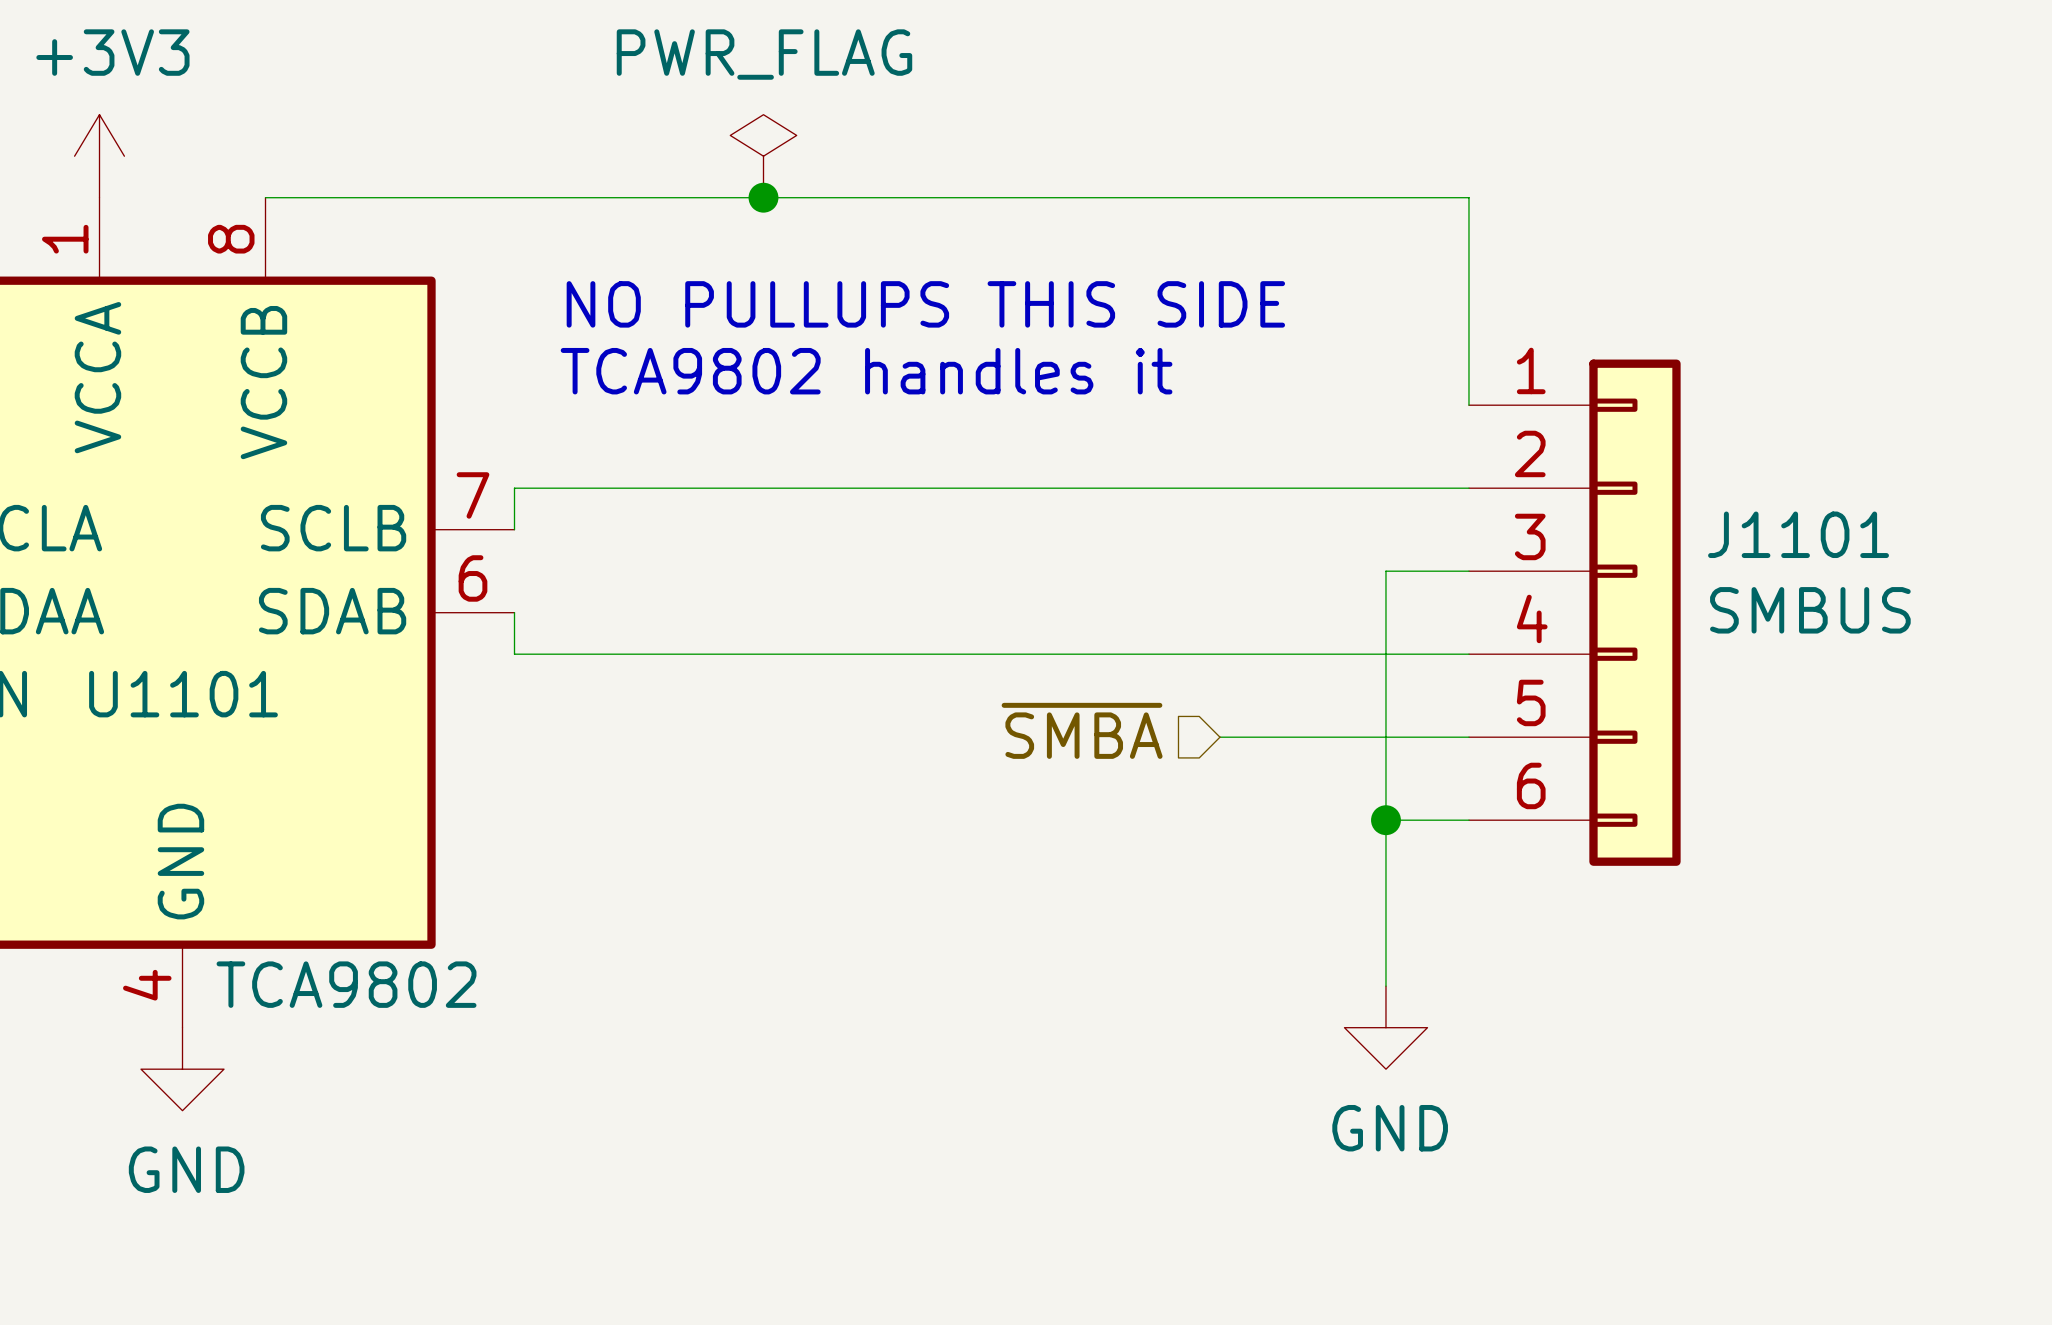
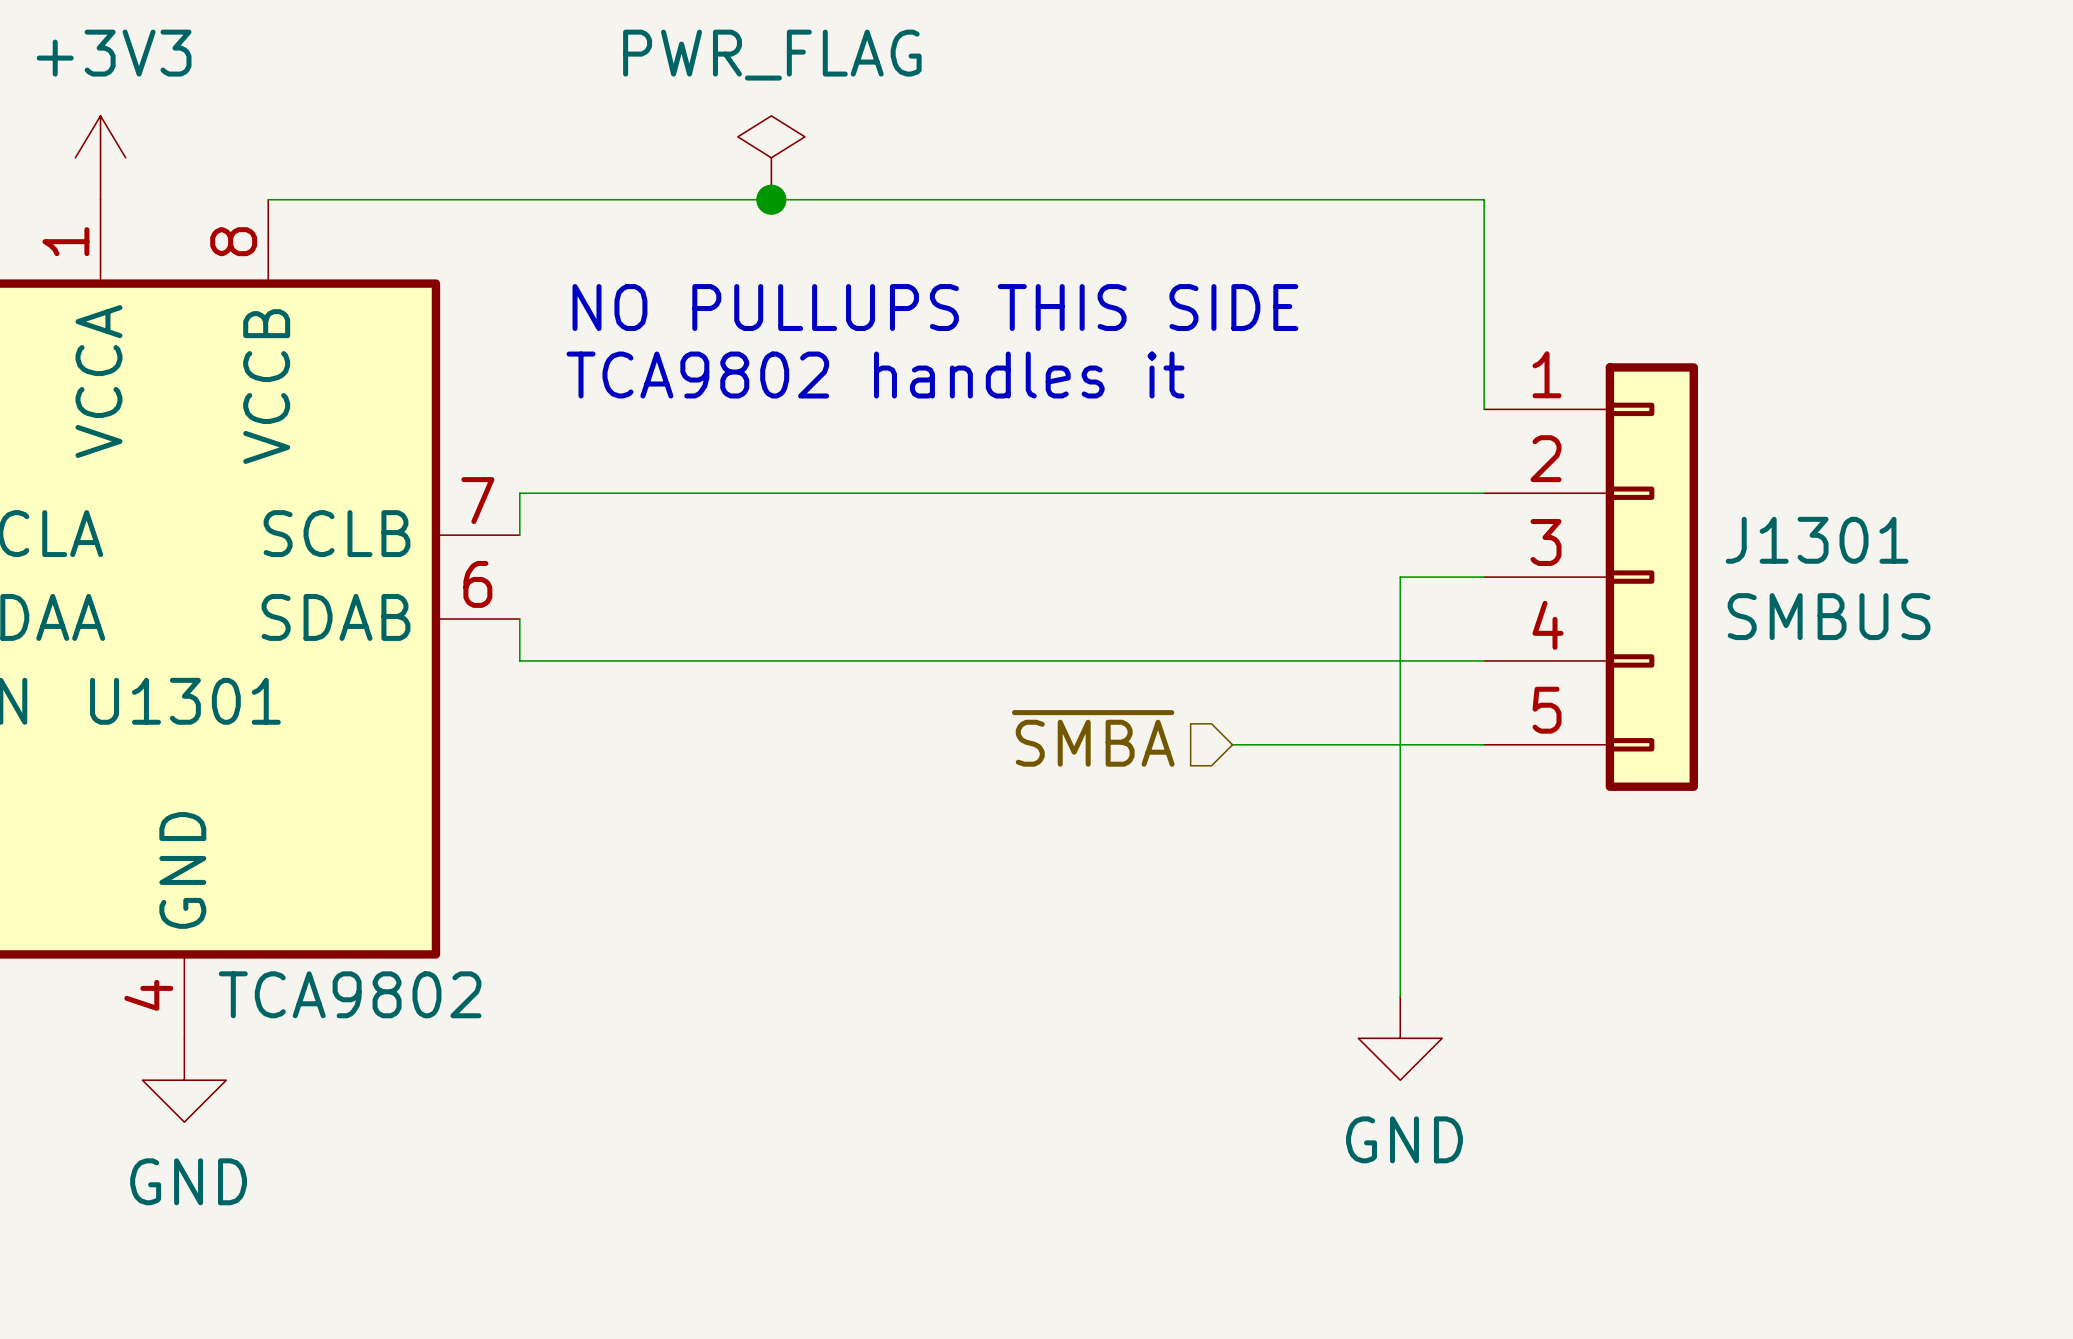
J1301: none -> SMBUS (1591, 577)
J1101: SMBUS (1574, 612) -> none
U1101 name: U1101 (183, 694) -> U1301 (185, 701)
wire: (1385, 820) (1468, 820) -> none
junction: (1385, 820) -> none

